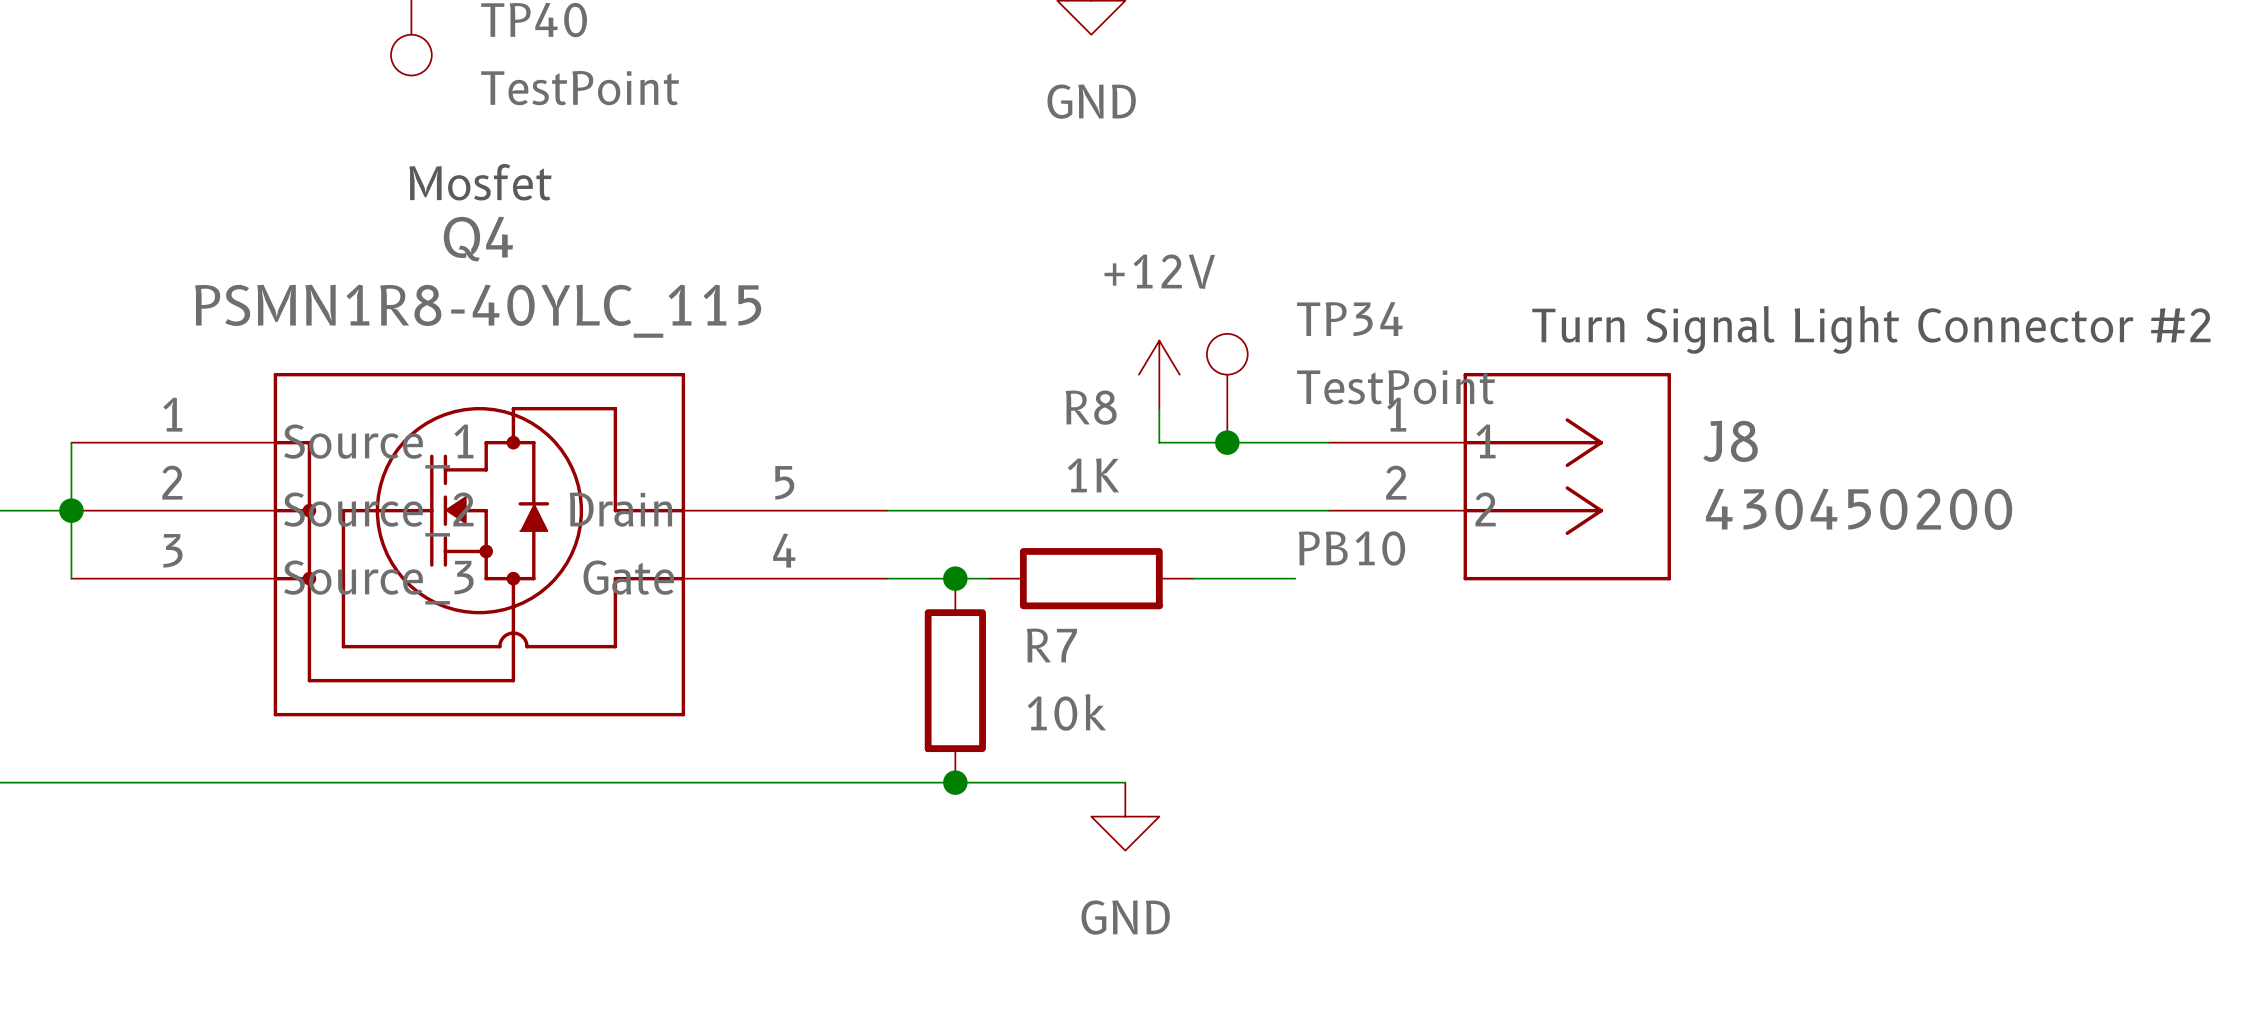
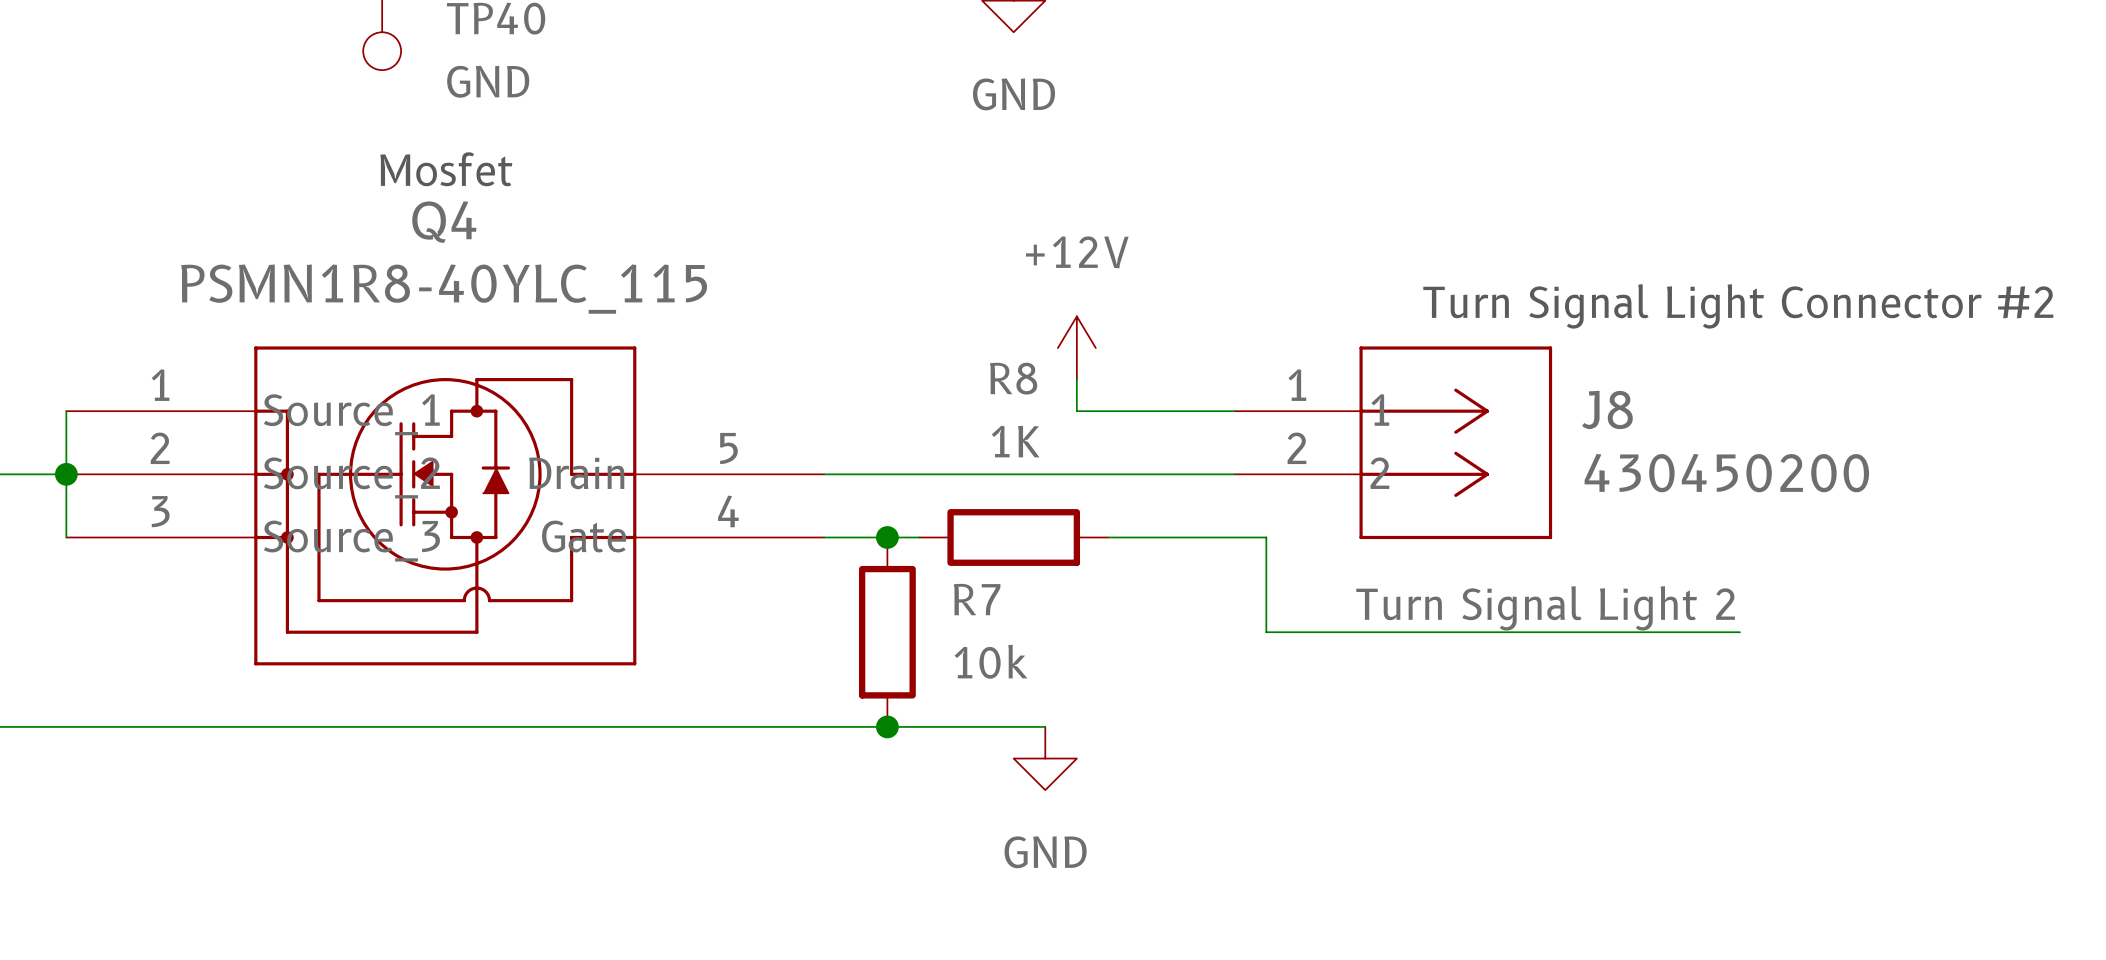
TP40 value: TestPoint (580, 88) -> GND (488, 81)
TP34: TestPoint (1227, 388) -> none
junction: (1227, 442) -> none
label: PB10 (1351, 548) -> none
wire: none -> (1203, 537) (1266, 537) (1266, 632) (1740, 632)
label: none -> Turn Signal Light 2 (1545, 608)

